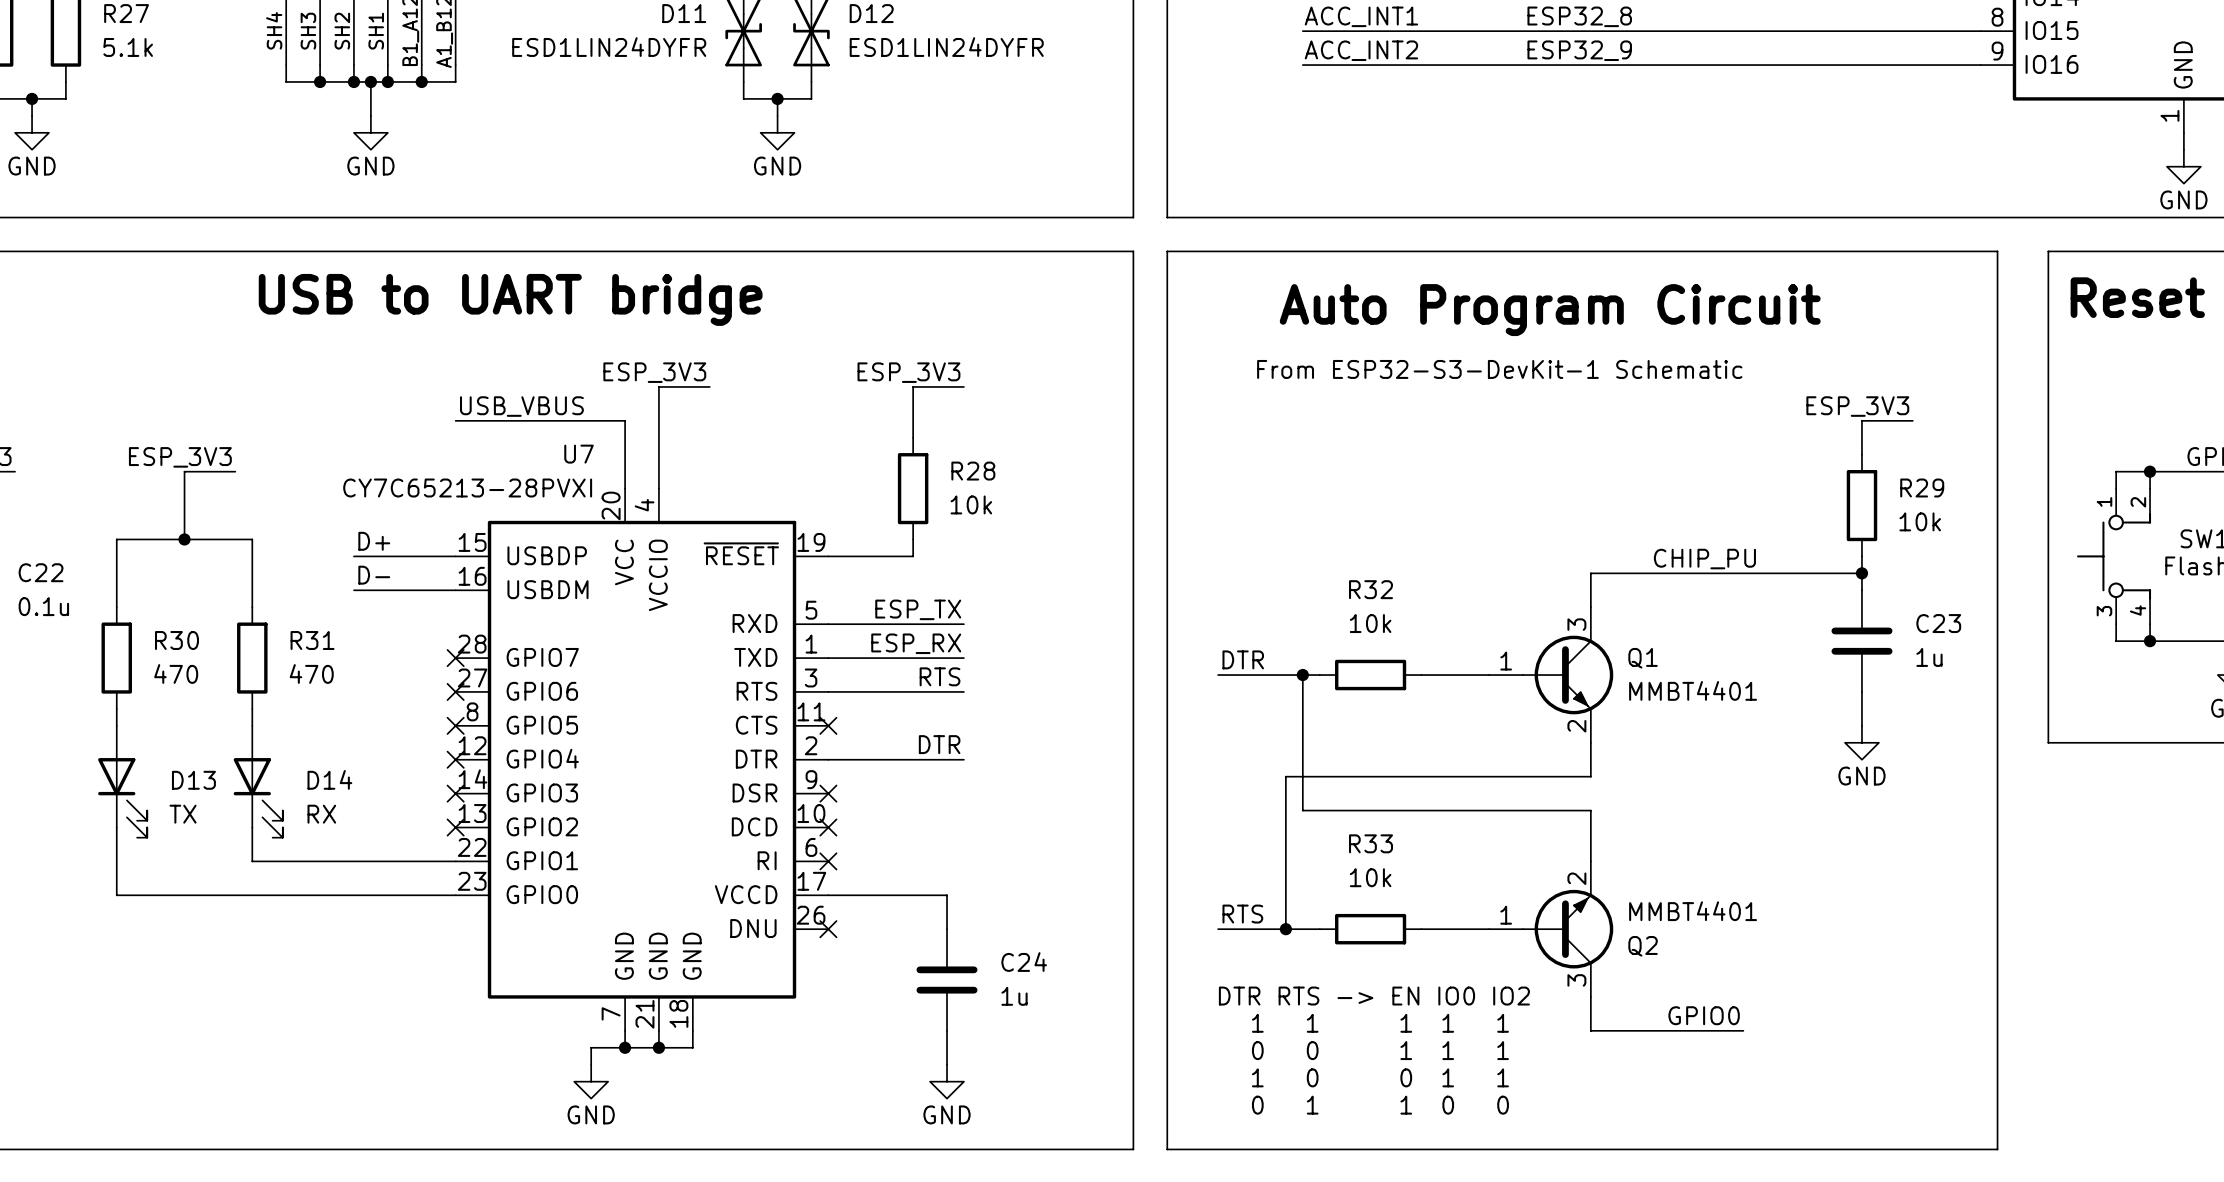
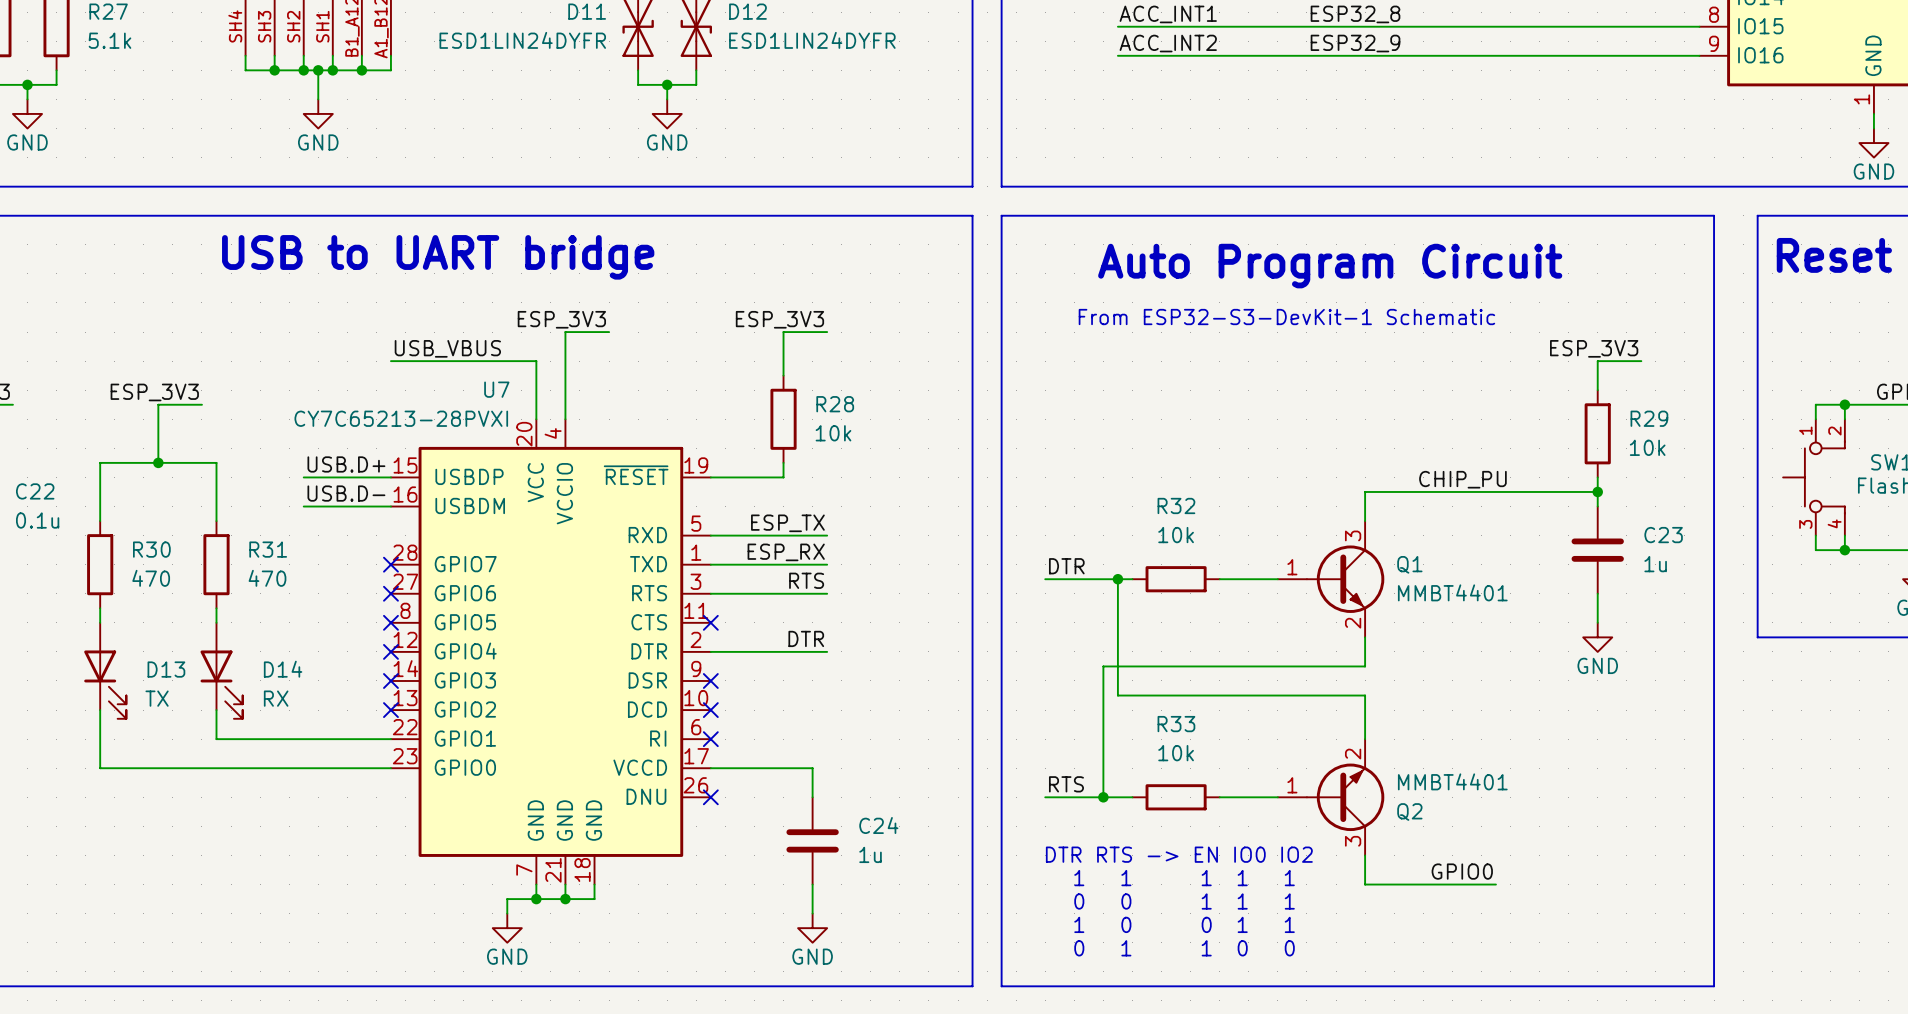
label: D+ (374, 541) -> USB.D+ (346, 464)
label: D- (374, 575) -> USB.D- (346, 493)

